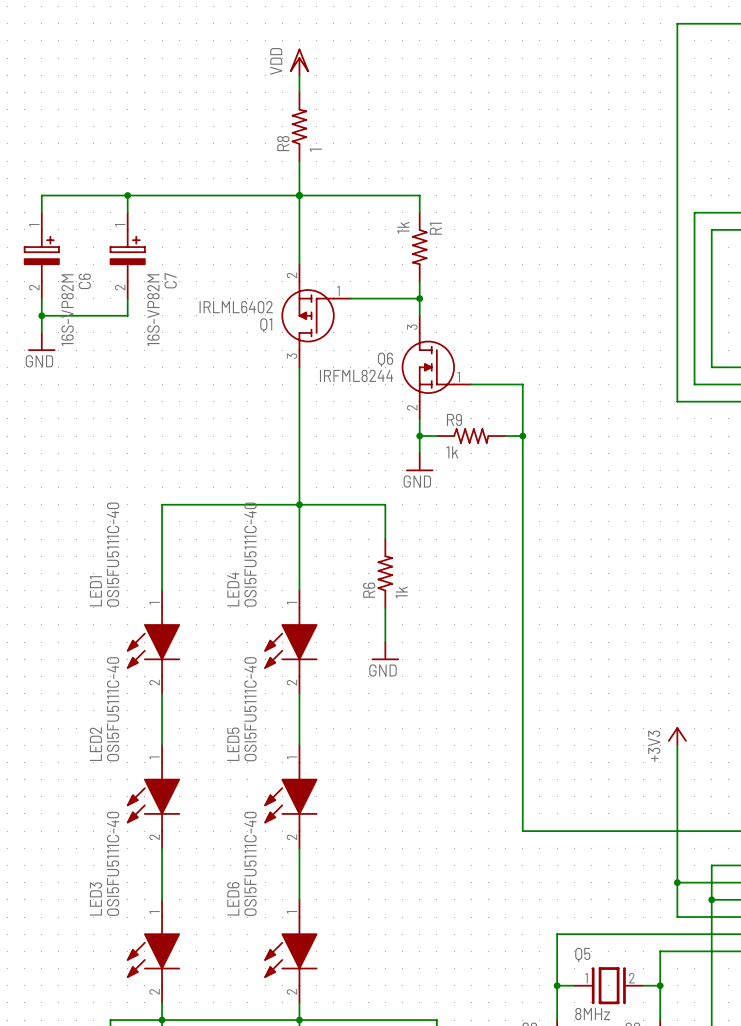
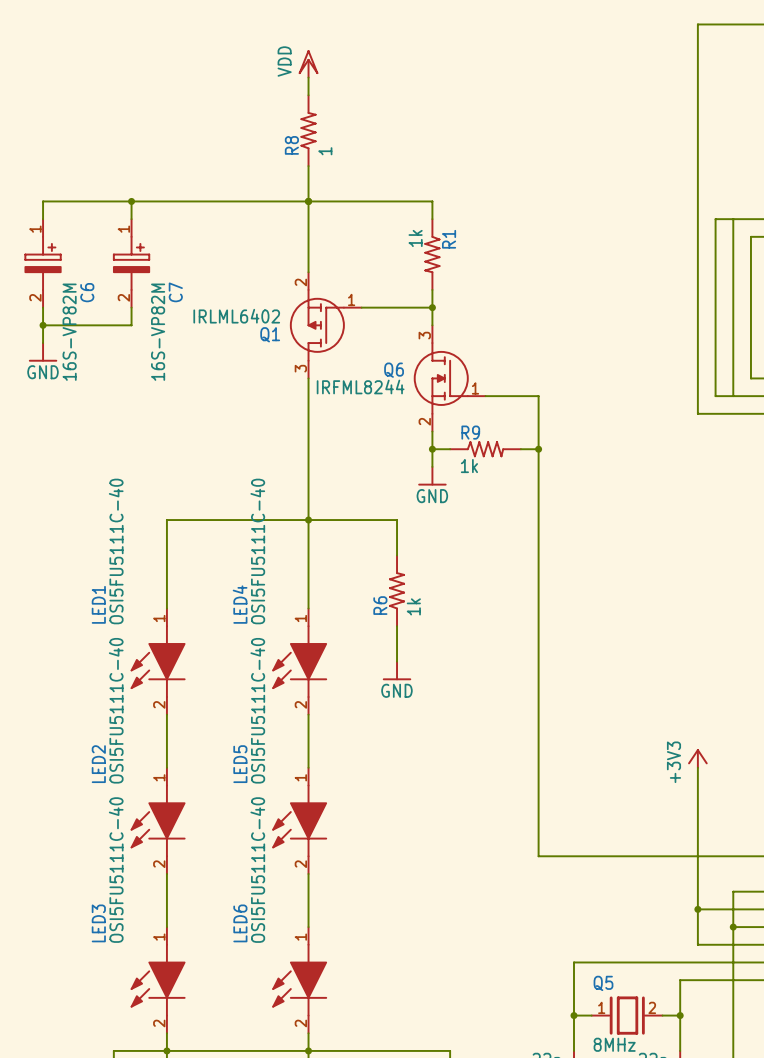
wire: (711, 229) (728, 229) -> (733, 236) (733, 219)
wire: none -> (750, 236) (750, 378)
wire: (711, 367) (728, 367) -> (733, 378) (733, 396)

